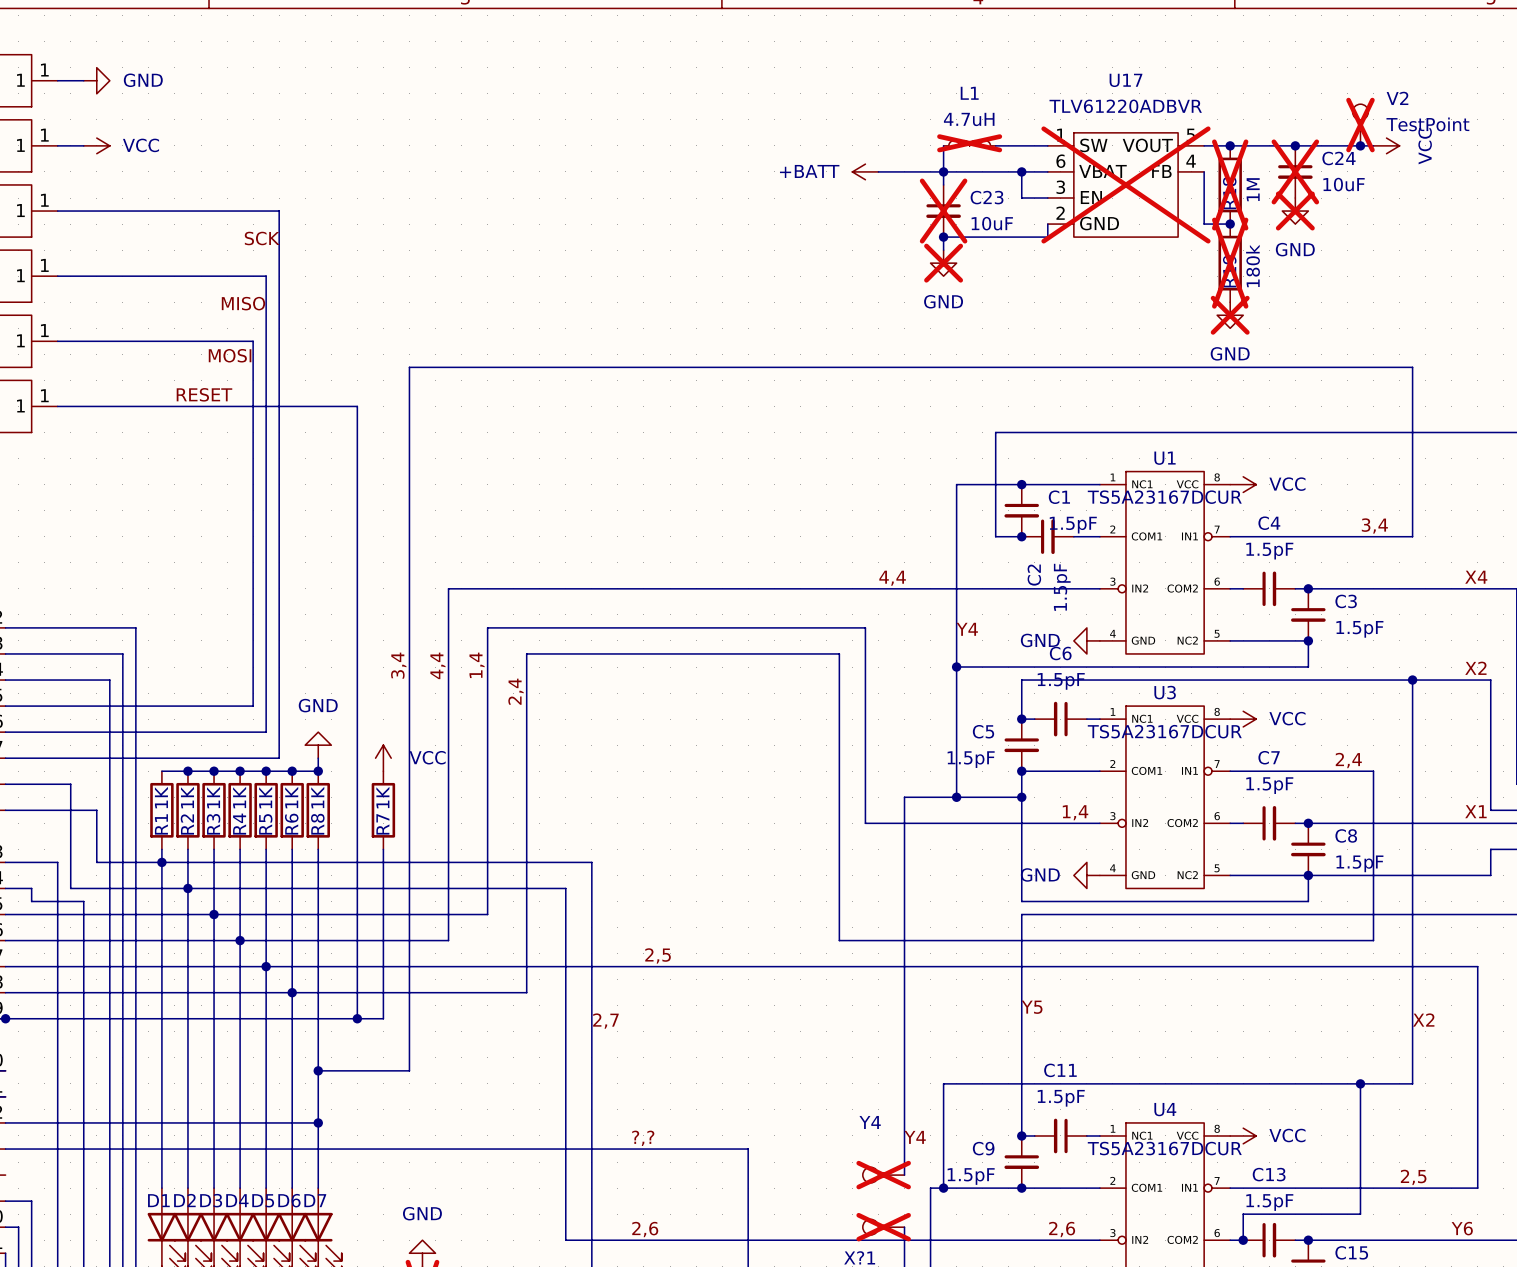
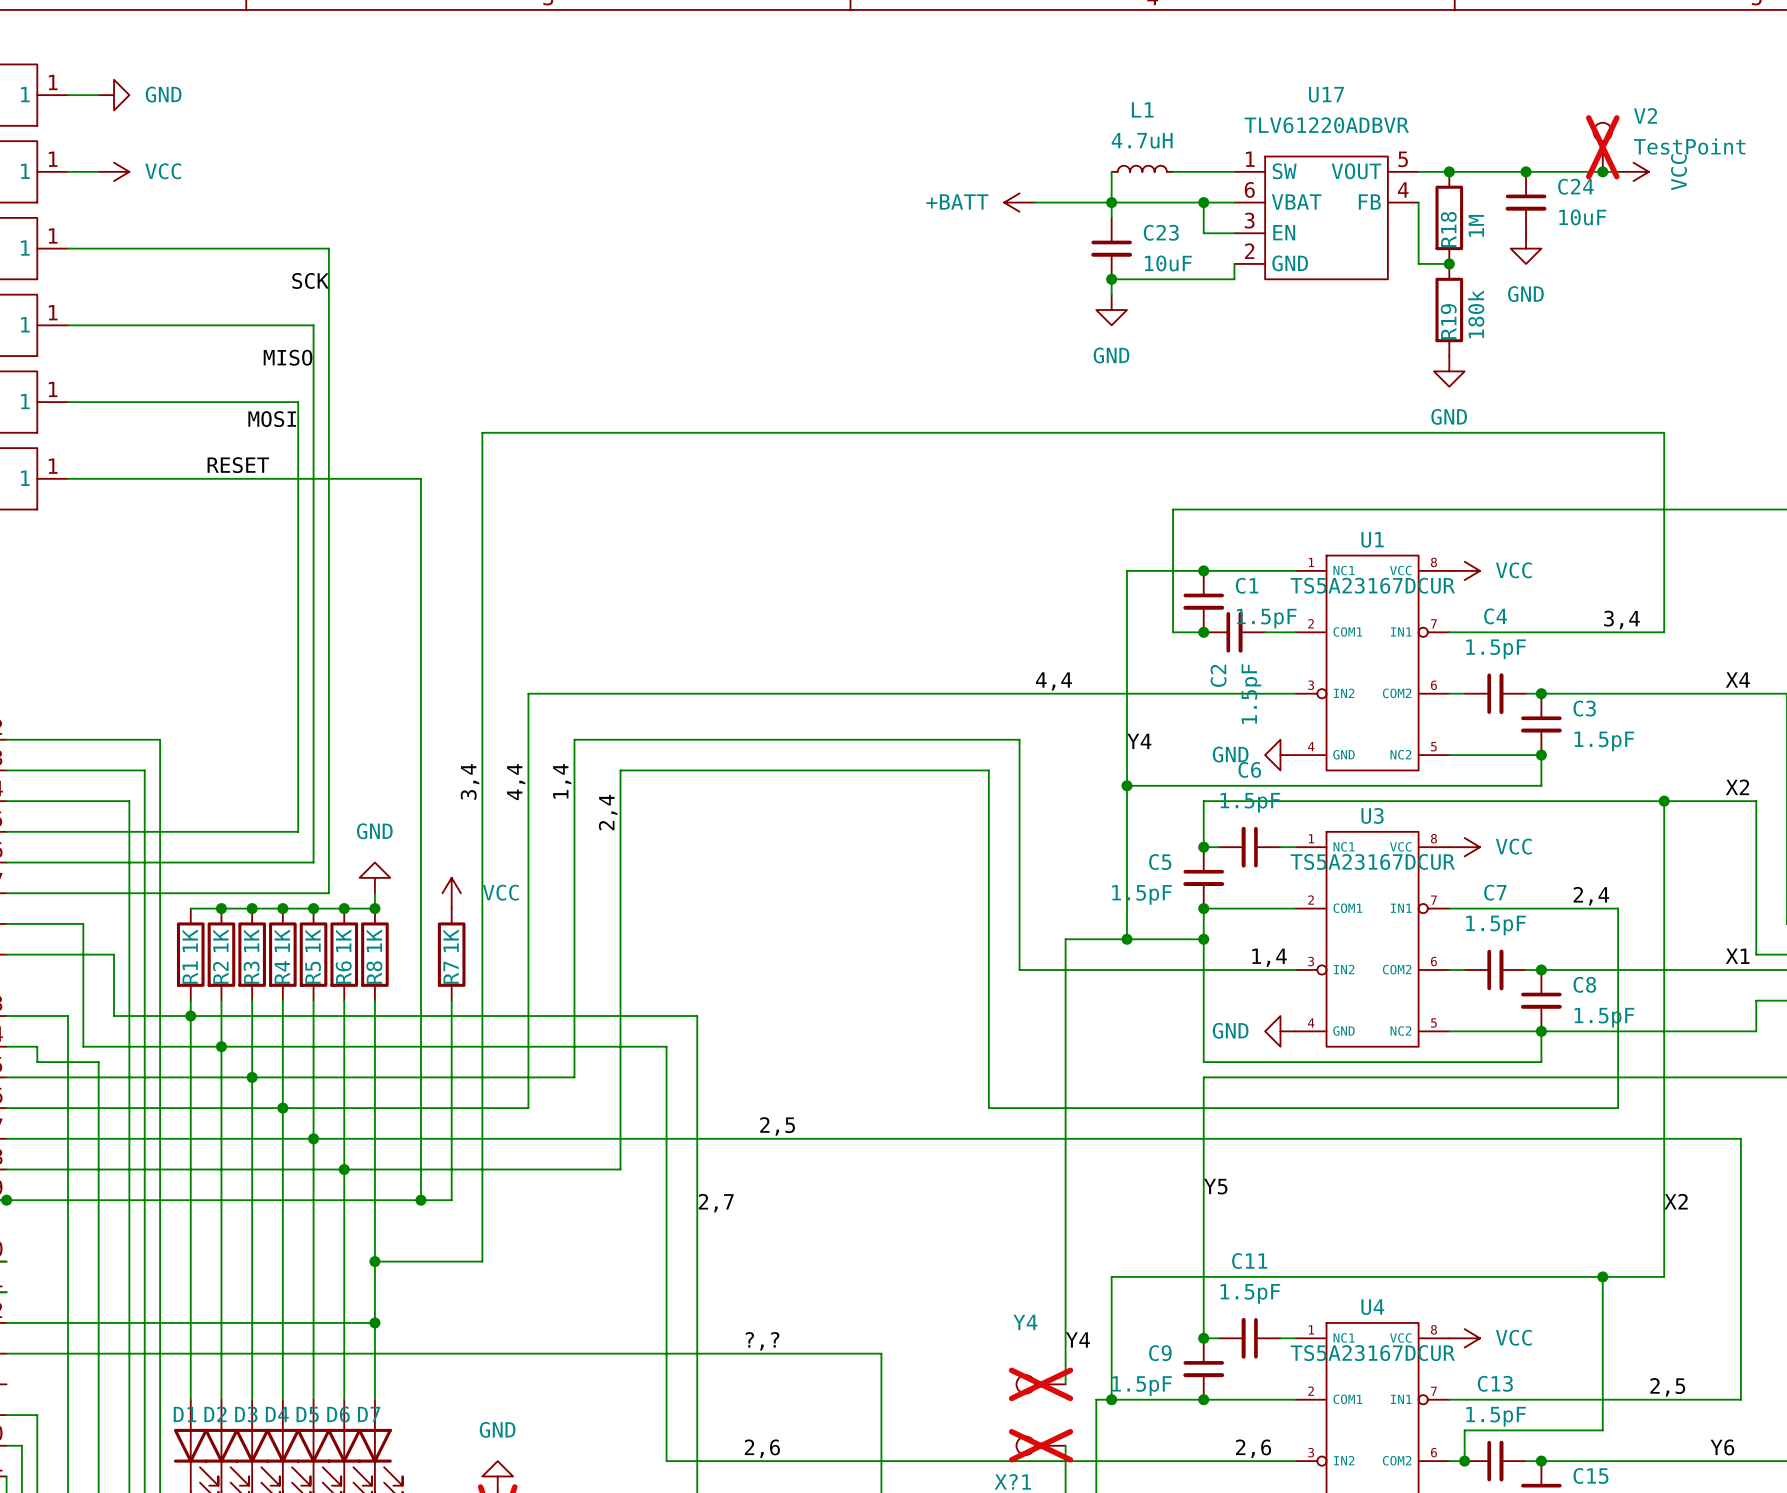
L1 do-not-place cross: (969, 143) -> none
C24 do-not-place cross: (1295, 171) -> none
U17 do-not-place cross: (1125, 184) -> none
R18 do-not-place cross: (1230, 184) -> none
C23 do-not-place cross: (943, 211) -> none
power symbol do-not-place cross: (1295, 211) -> none
power symbol do-not-place cross: (943, 263) -> none
R19 do-not-place cross: (1230, 263) -> none
power symbol do-not-place cross: (1230, 315) -> none

